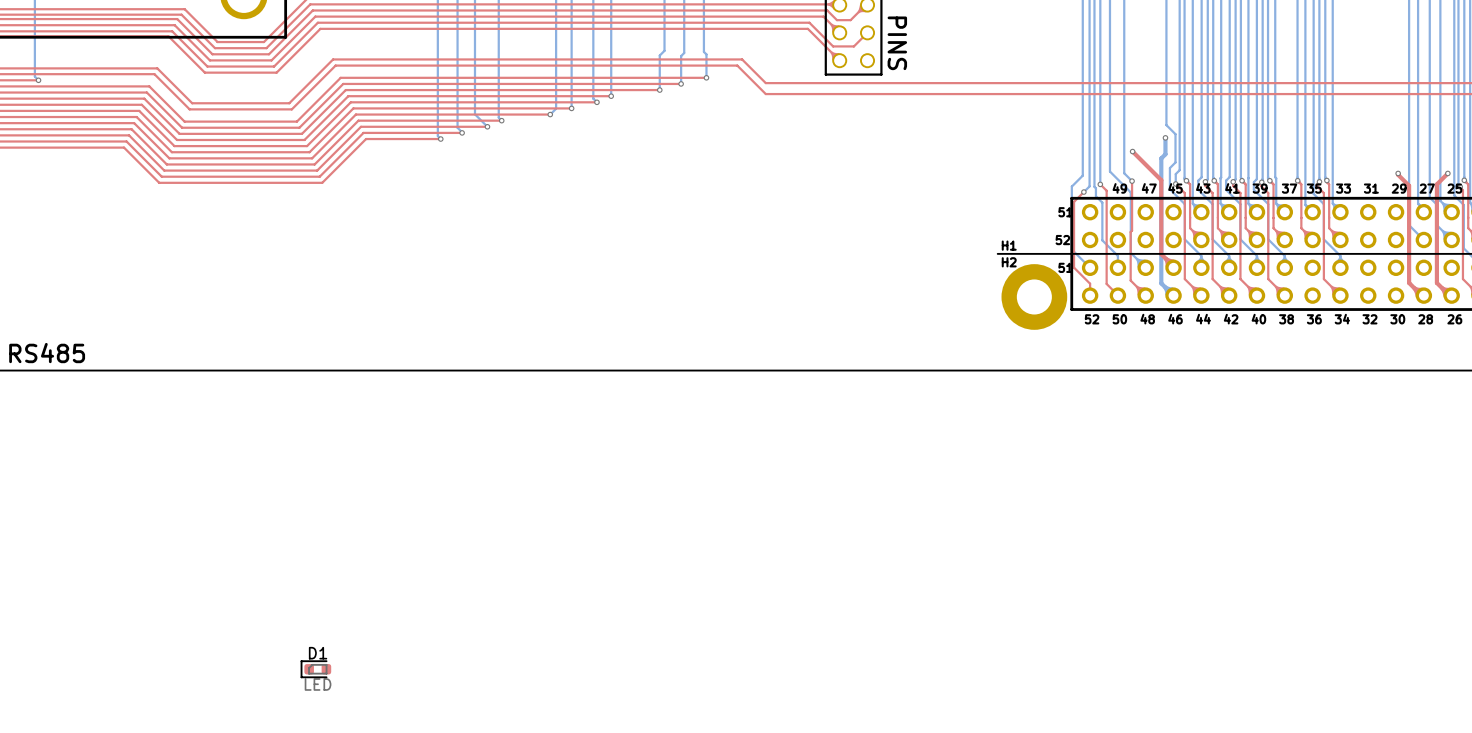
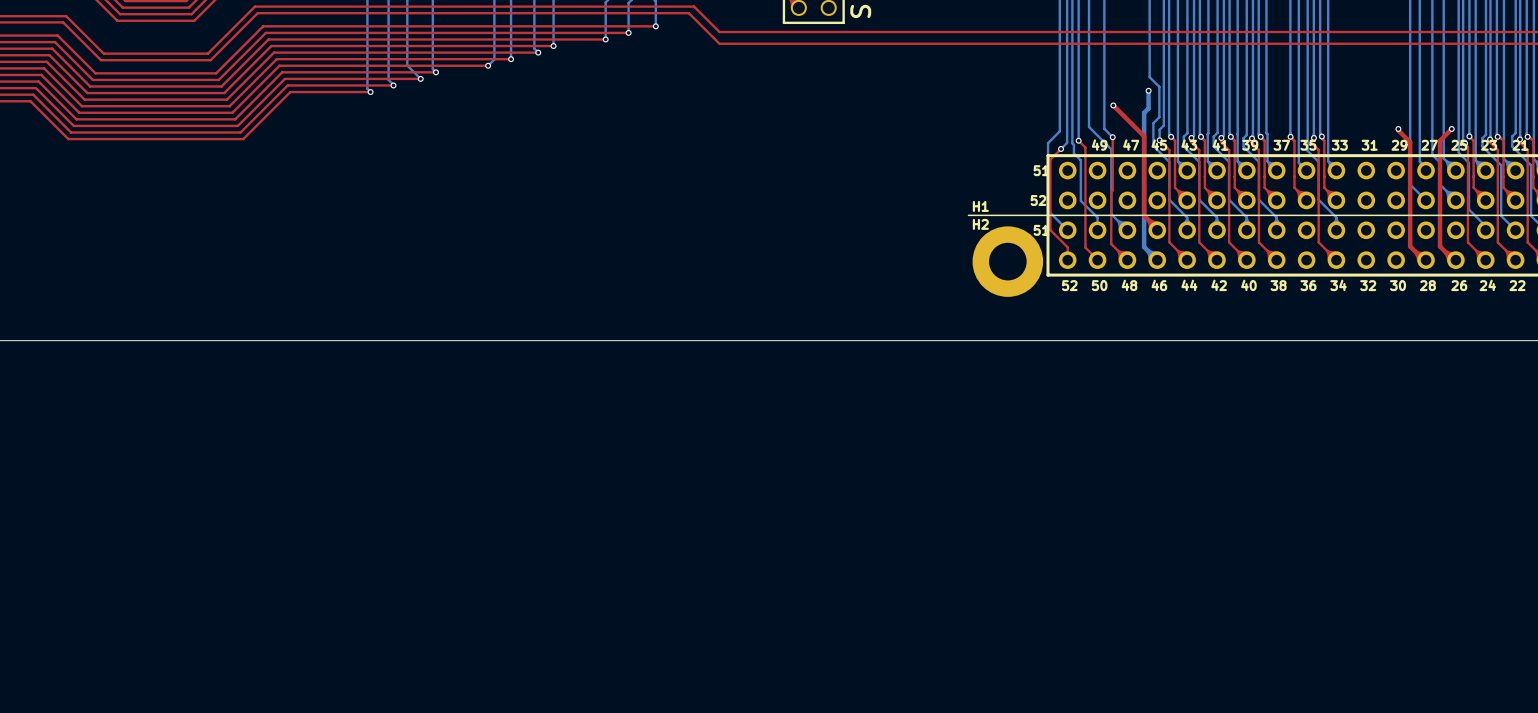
D1: LED (316, 669) -> none

